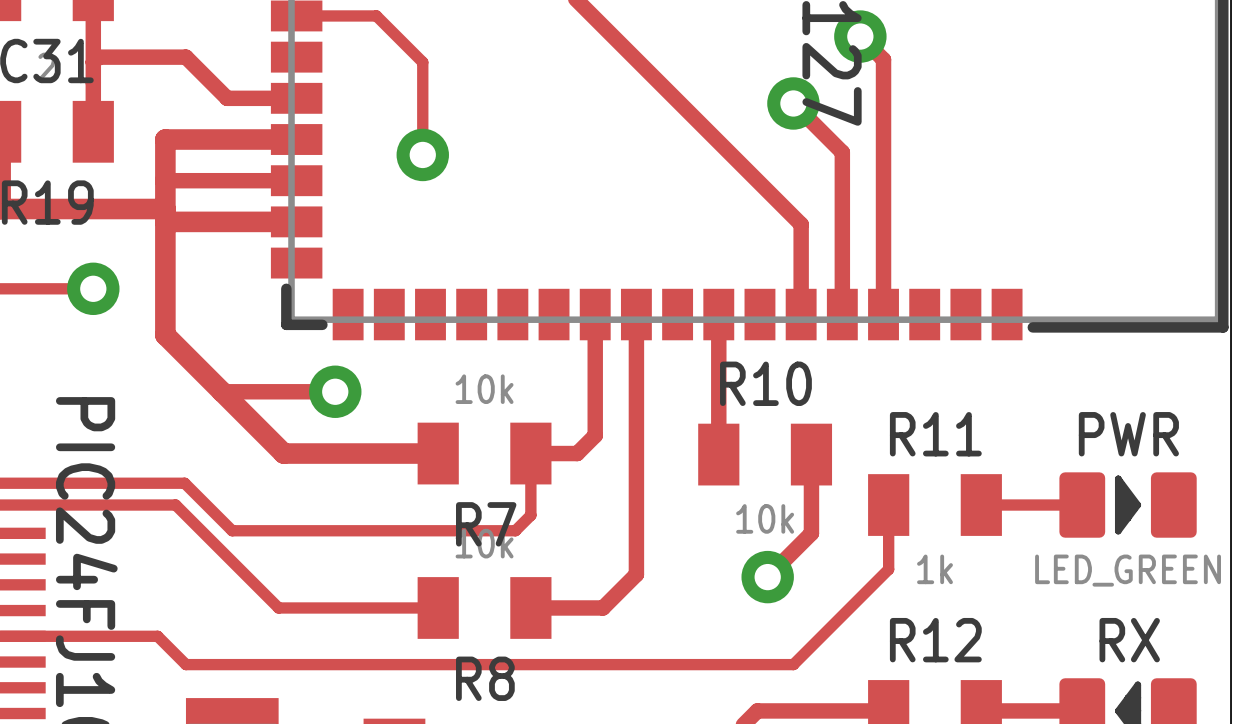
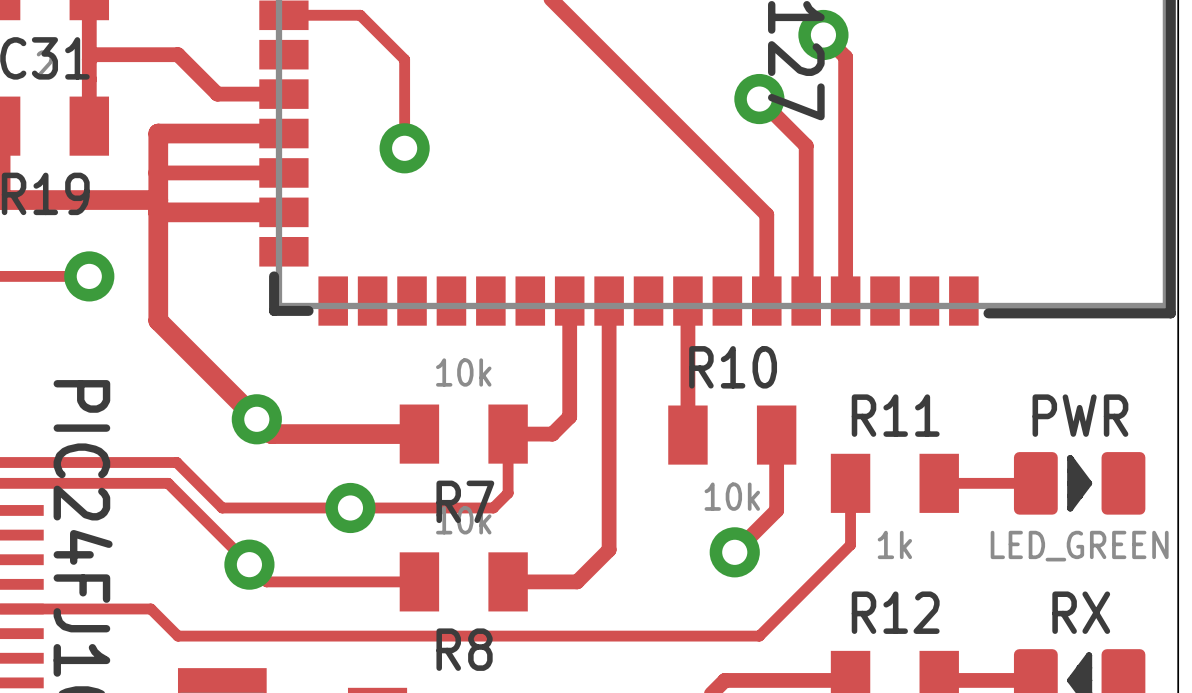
track: (222, 391) (335, 391) -> none
via: (335, 391) -> none
via: none -> (256, 419)
via: none -> (350, 507)
via: none -> (249, 564)

